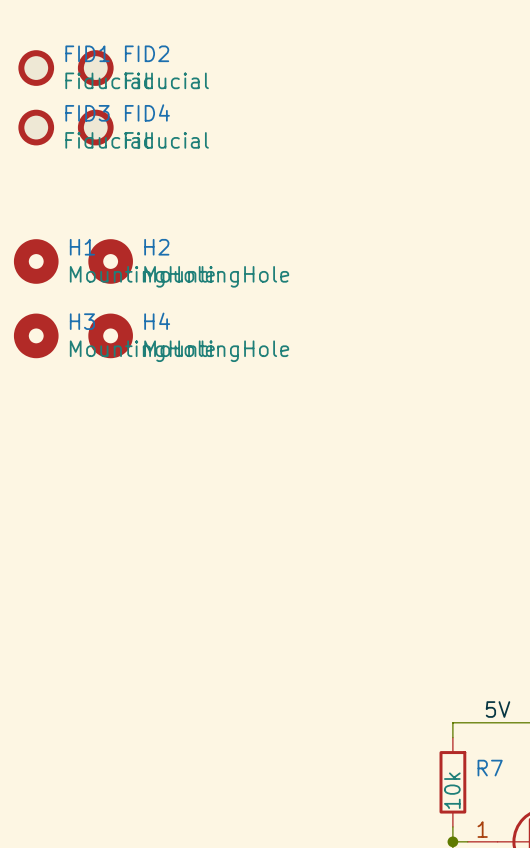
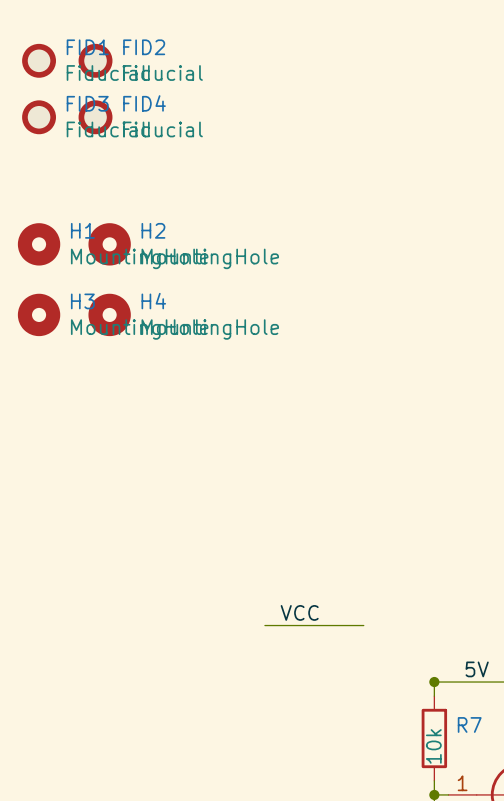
label: none -> VCC (299, 612)
wire: none -> (264, 625) (363, 625)
junction: none -> (434, 682)

